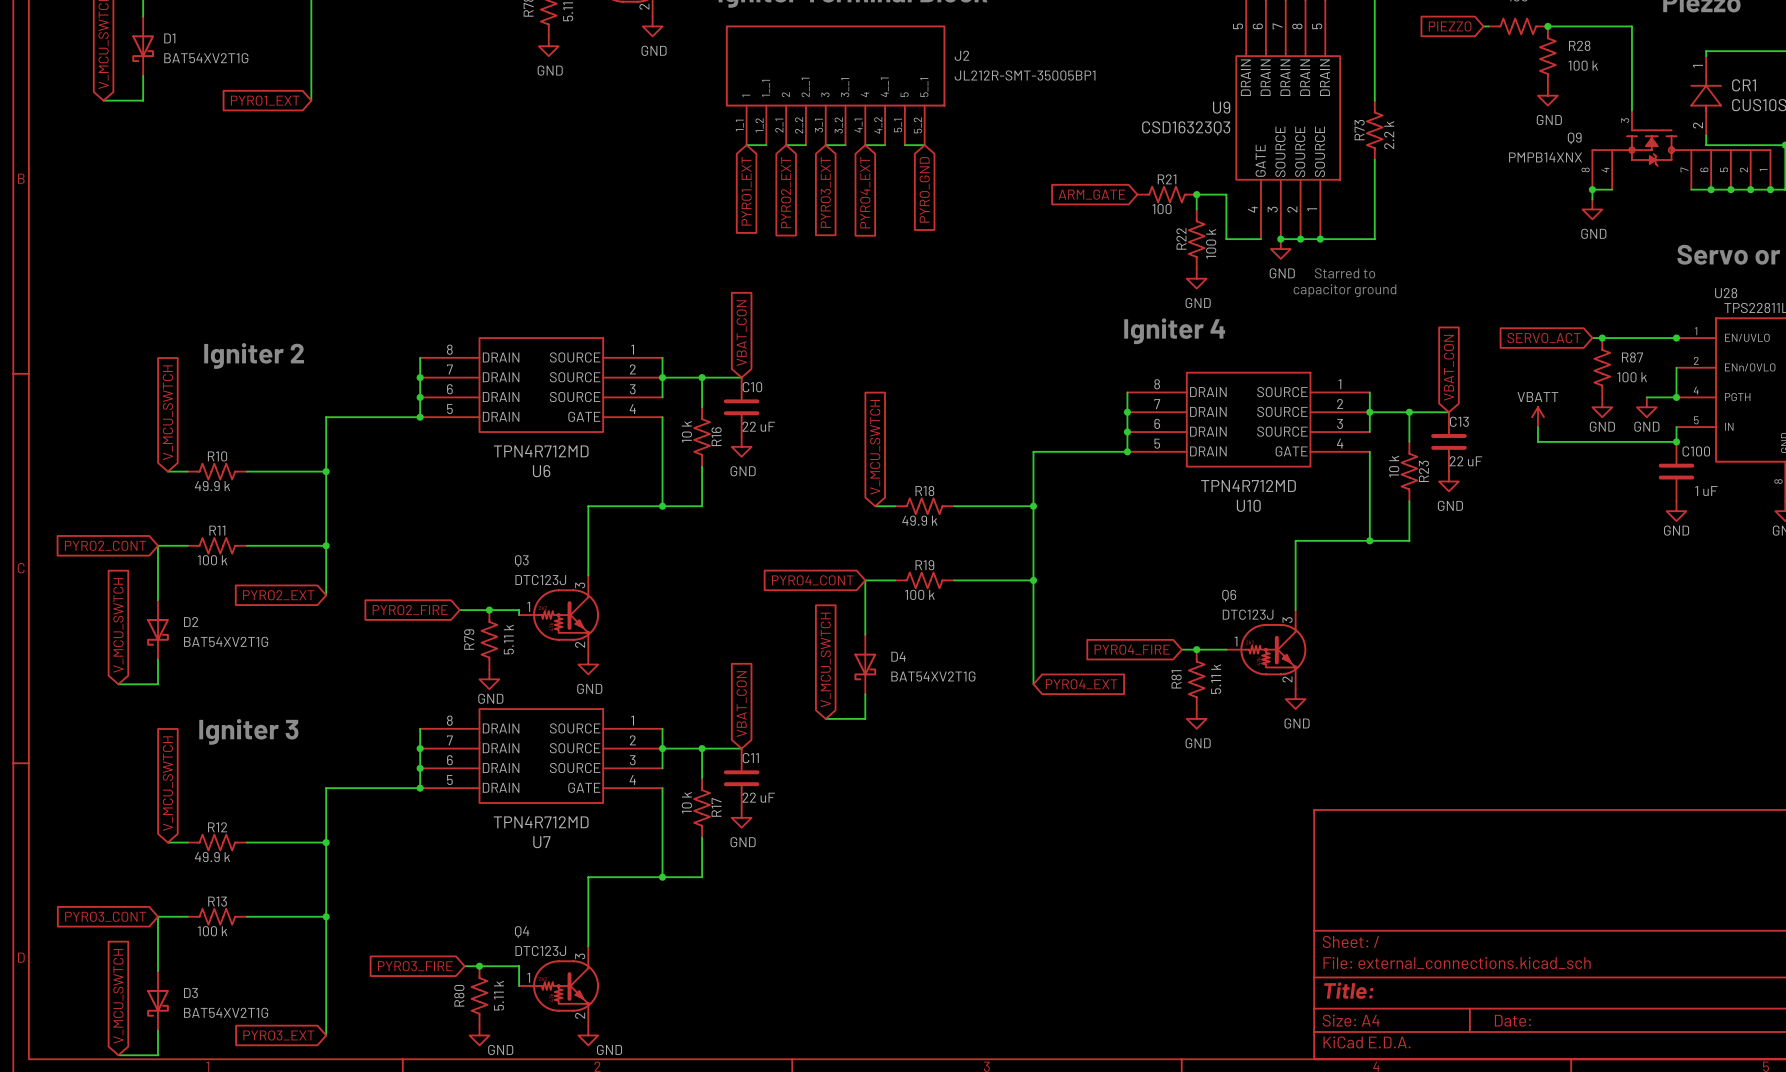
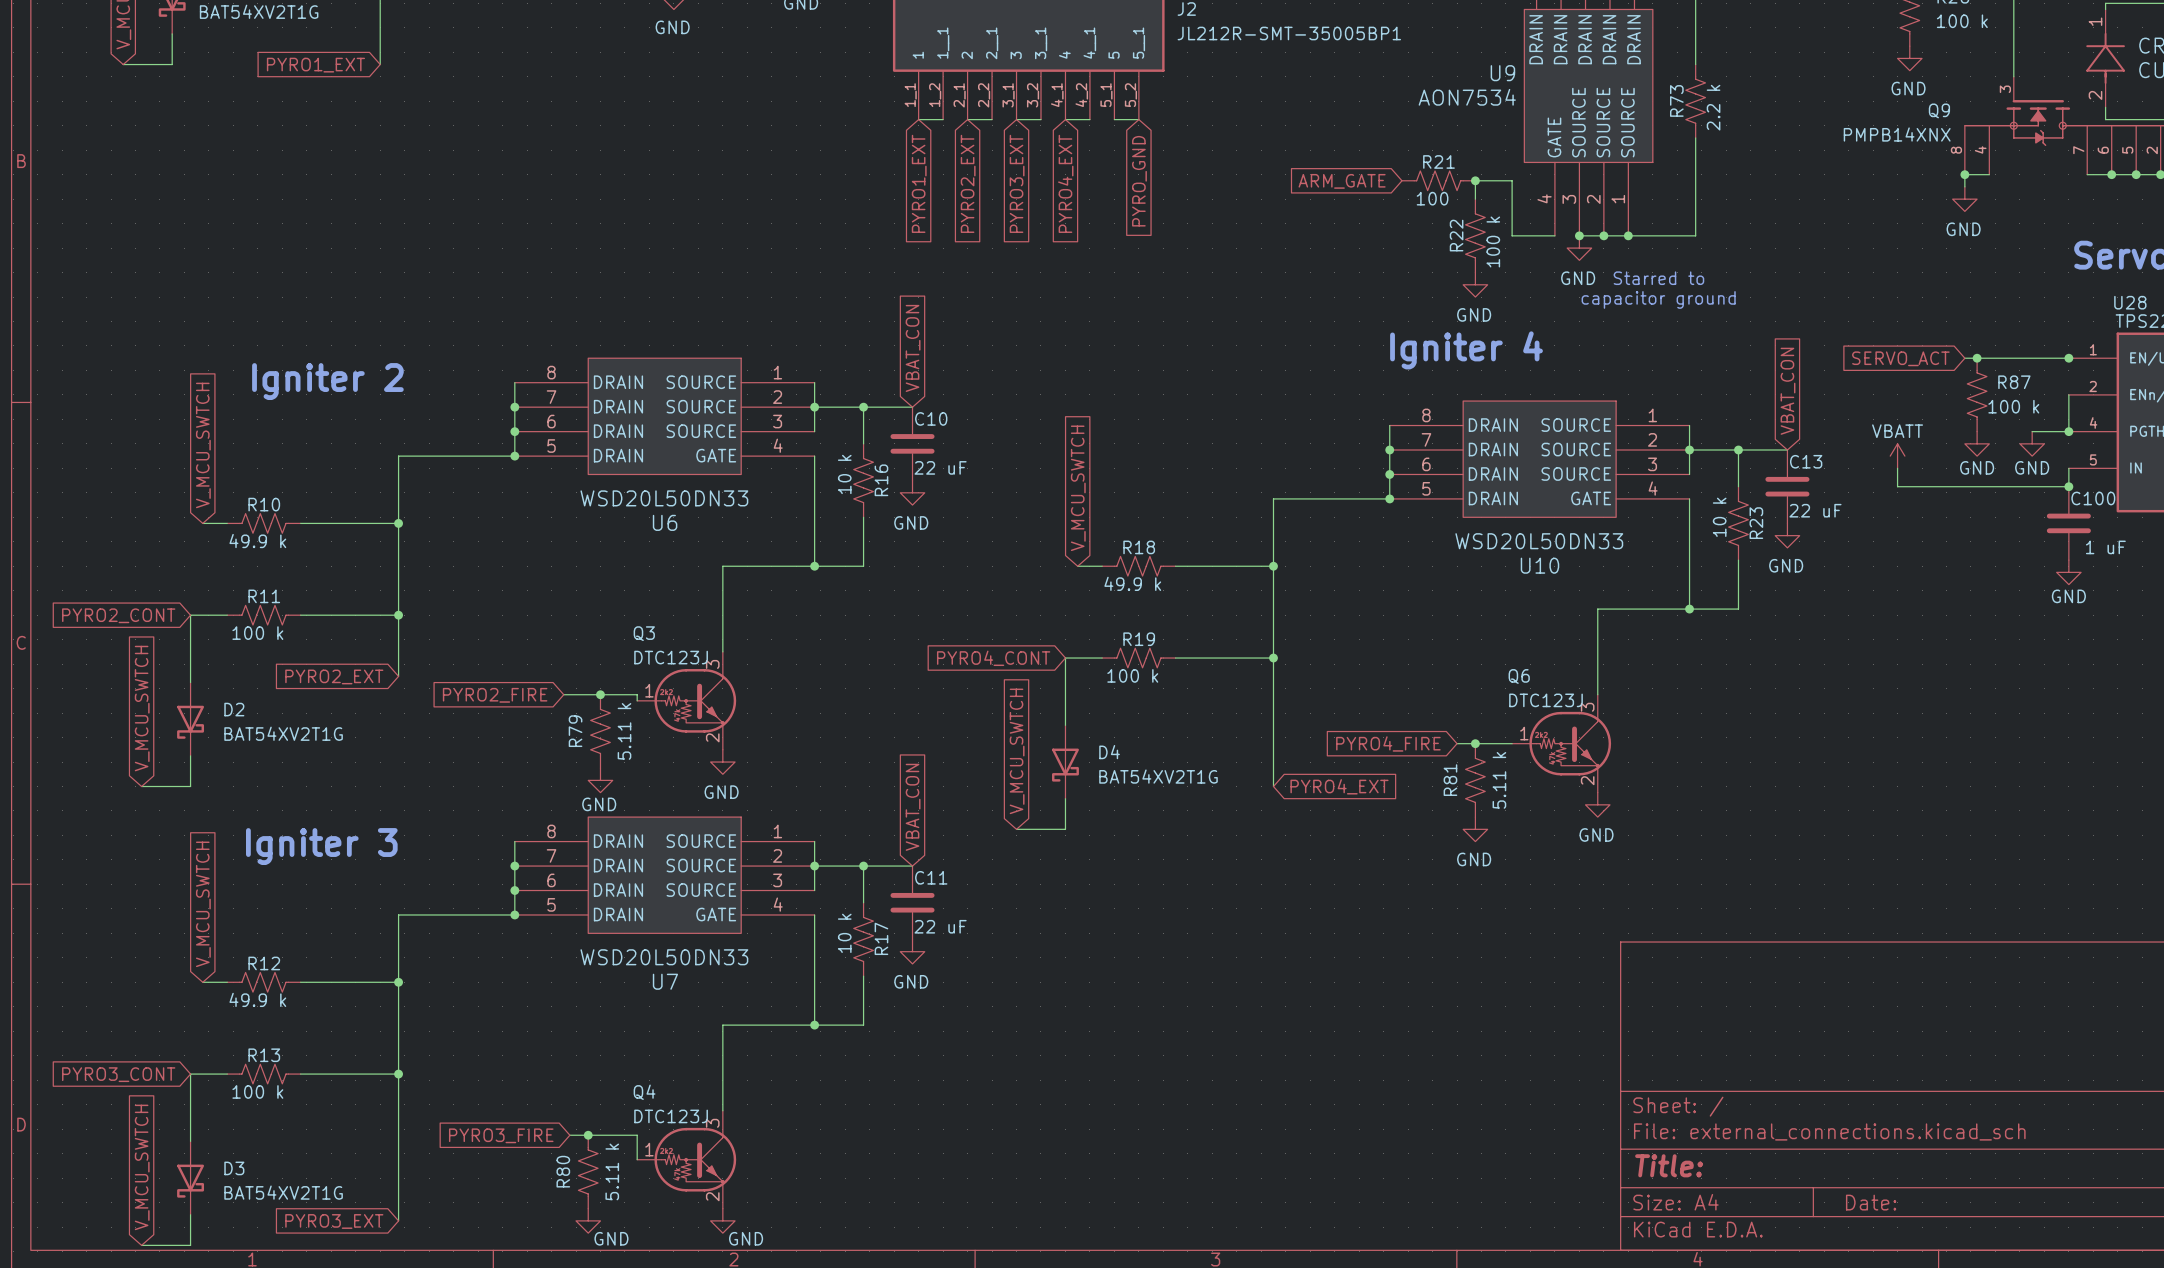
U9 value: CSD16323Q3 (1186, 128) -> AON7534 (1467, 97)
U6 value: TPN4R712MD (541, 451) -> WSD20L50DN33 (664, 498)
U10 value: TPN4R712MD (1248, 485) -> WSD20L50DN33 (1539, 541)
U7 value: TPN4R712MD (541, 822) -> WSD20L50DN33 (664, 957)

